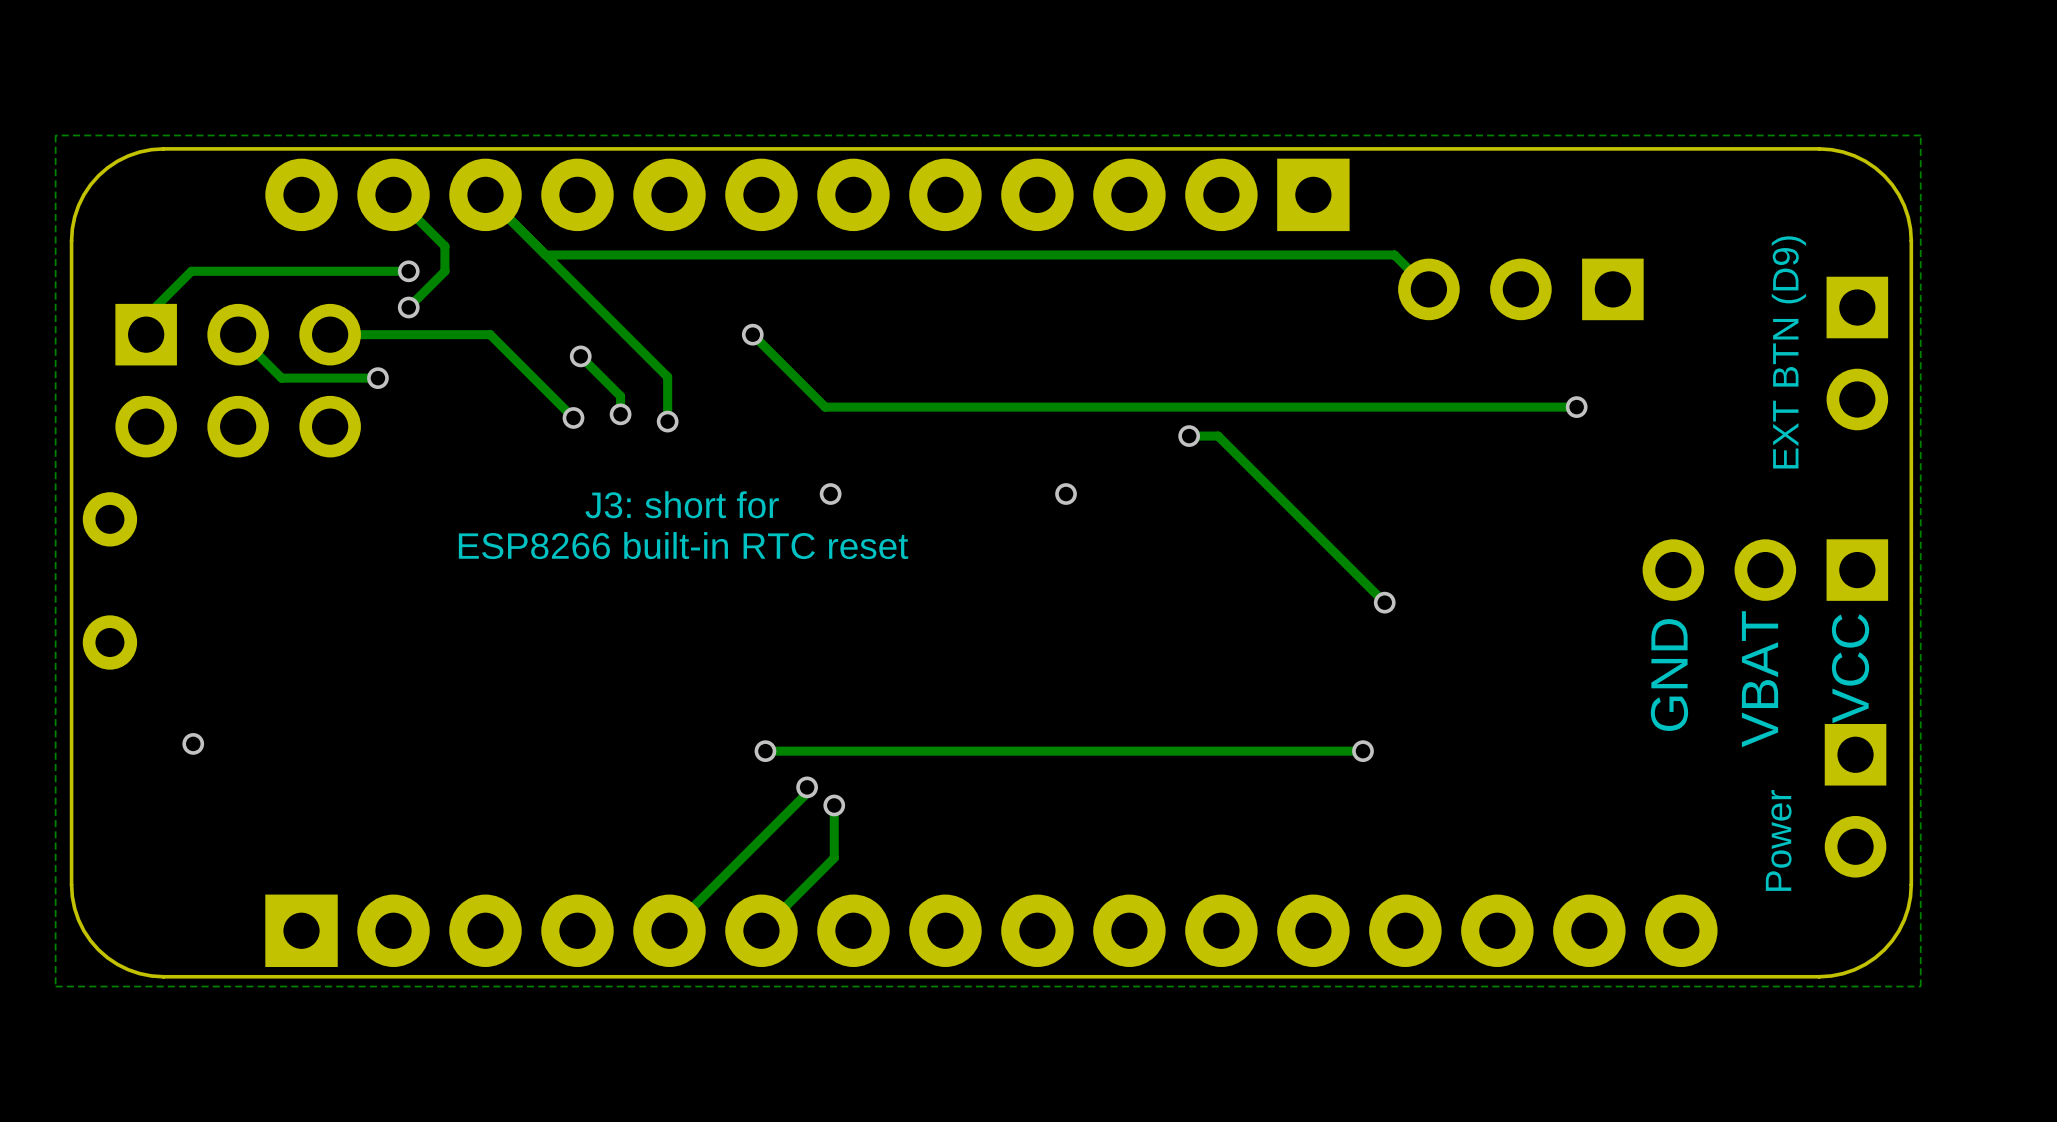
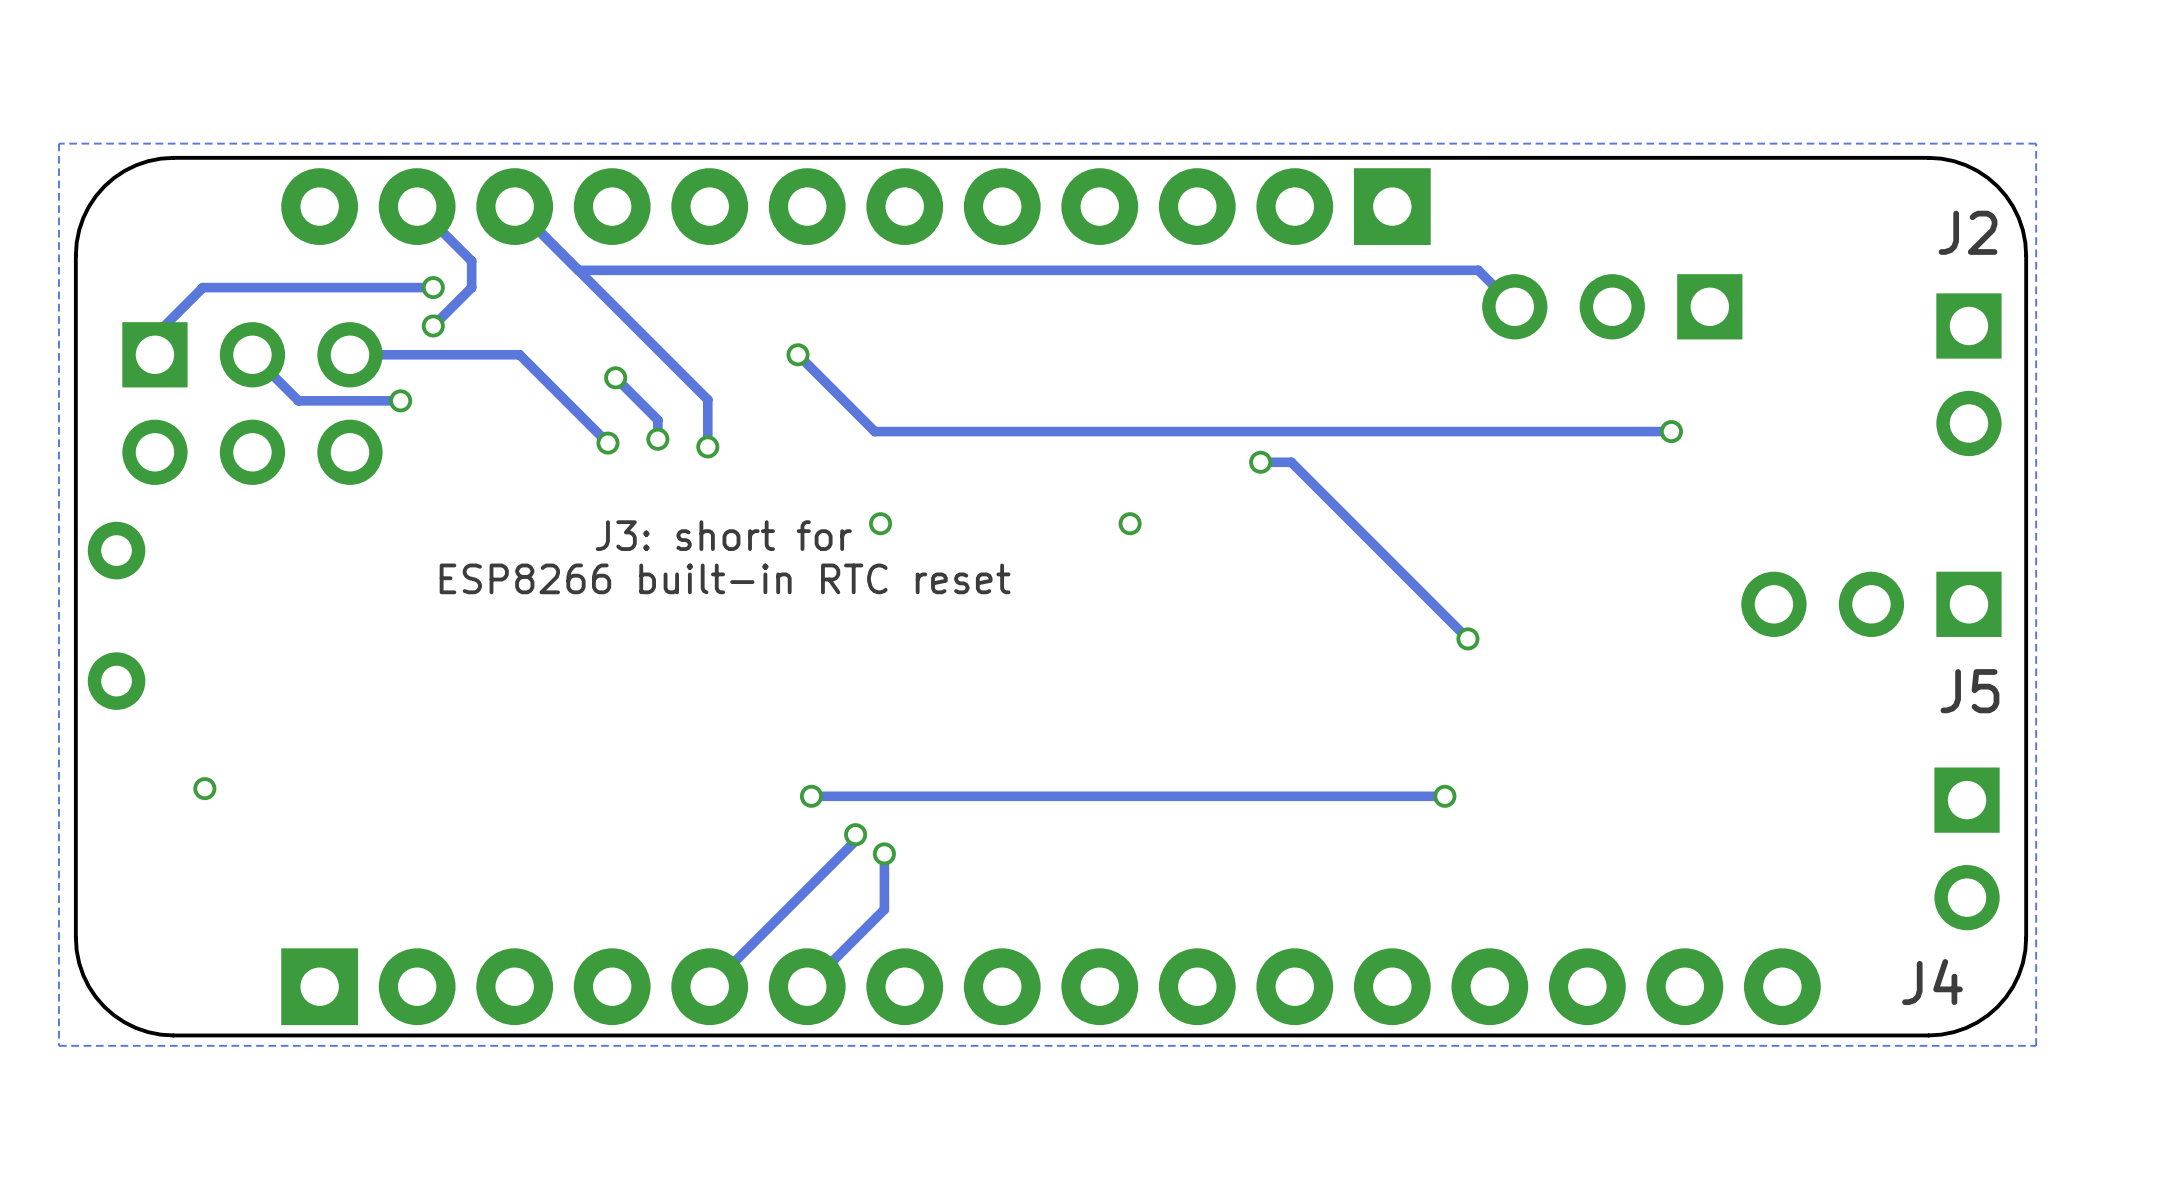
J2 name: none -> J2 (1968, 232)
text: EXT BTN (D9) (1788, 352) -> none
J5 name: none -> J5 (1969, 691)
text: VCC (1850, 668) -> none
text: GND (1669, 675) -> none
text: VBAT (1760, 679) -> none
text: Power (1778, 840) -> none
J4 name: none -> J4 (1932, 982)

